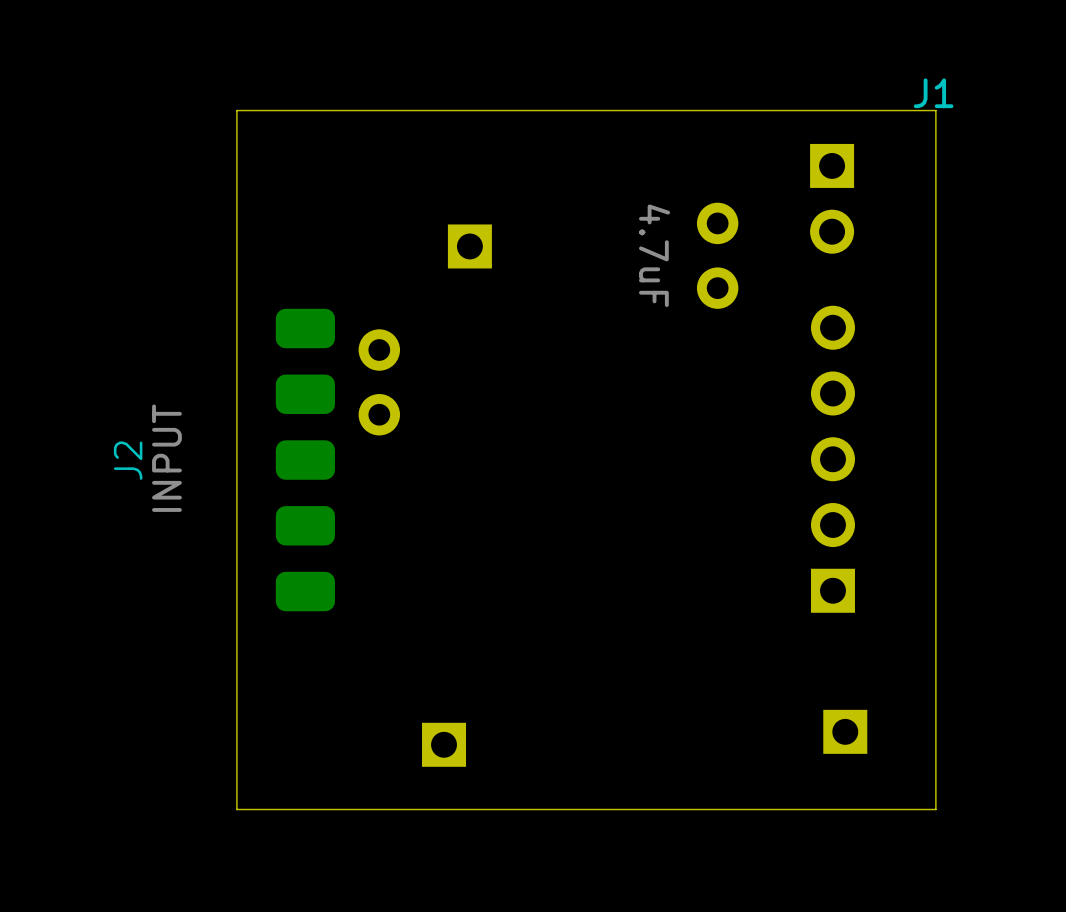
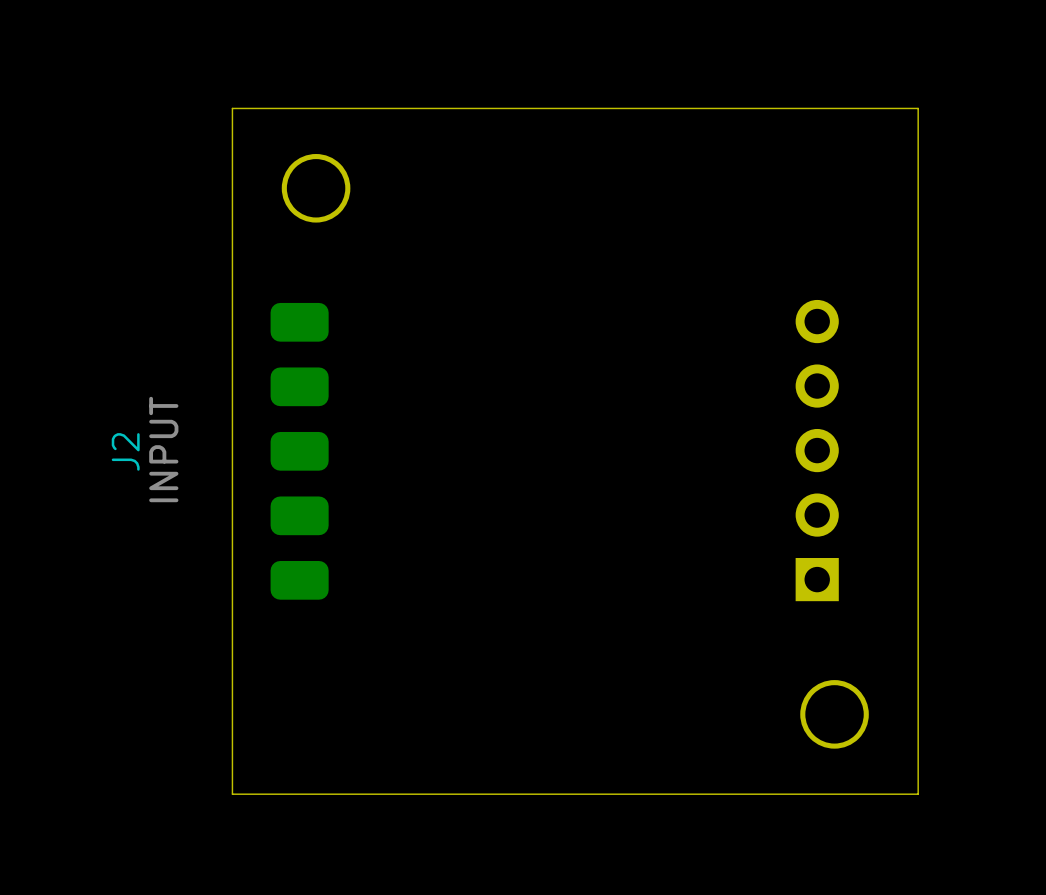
round board edge: none -> [281, 153, 351, 223]
J1: (832, 198) -> none
part: (469, 246) -> none
part: 4.7uF (717, 255) -> none
part: (379, 382) -> none
round board edge: none -> [800, 680, 869, 749]
part: (845, 731) -> none
part: (444, 744) -> none

